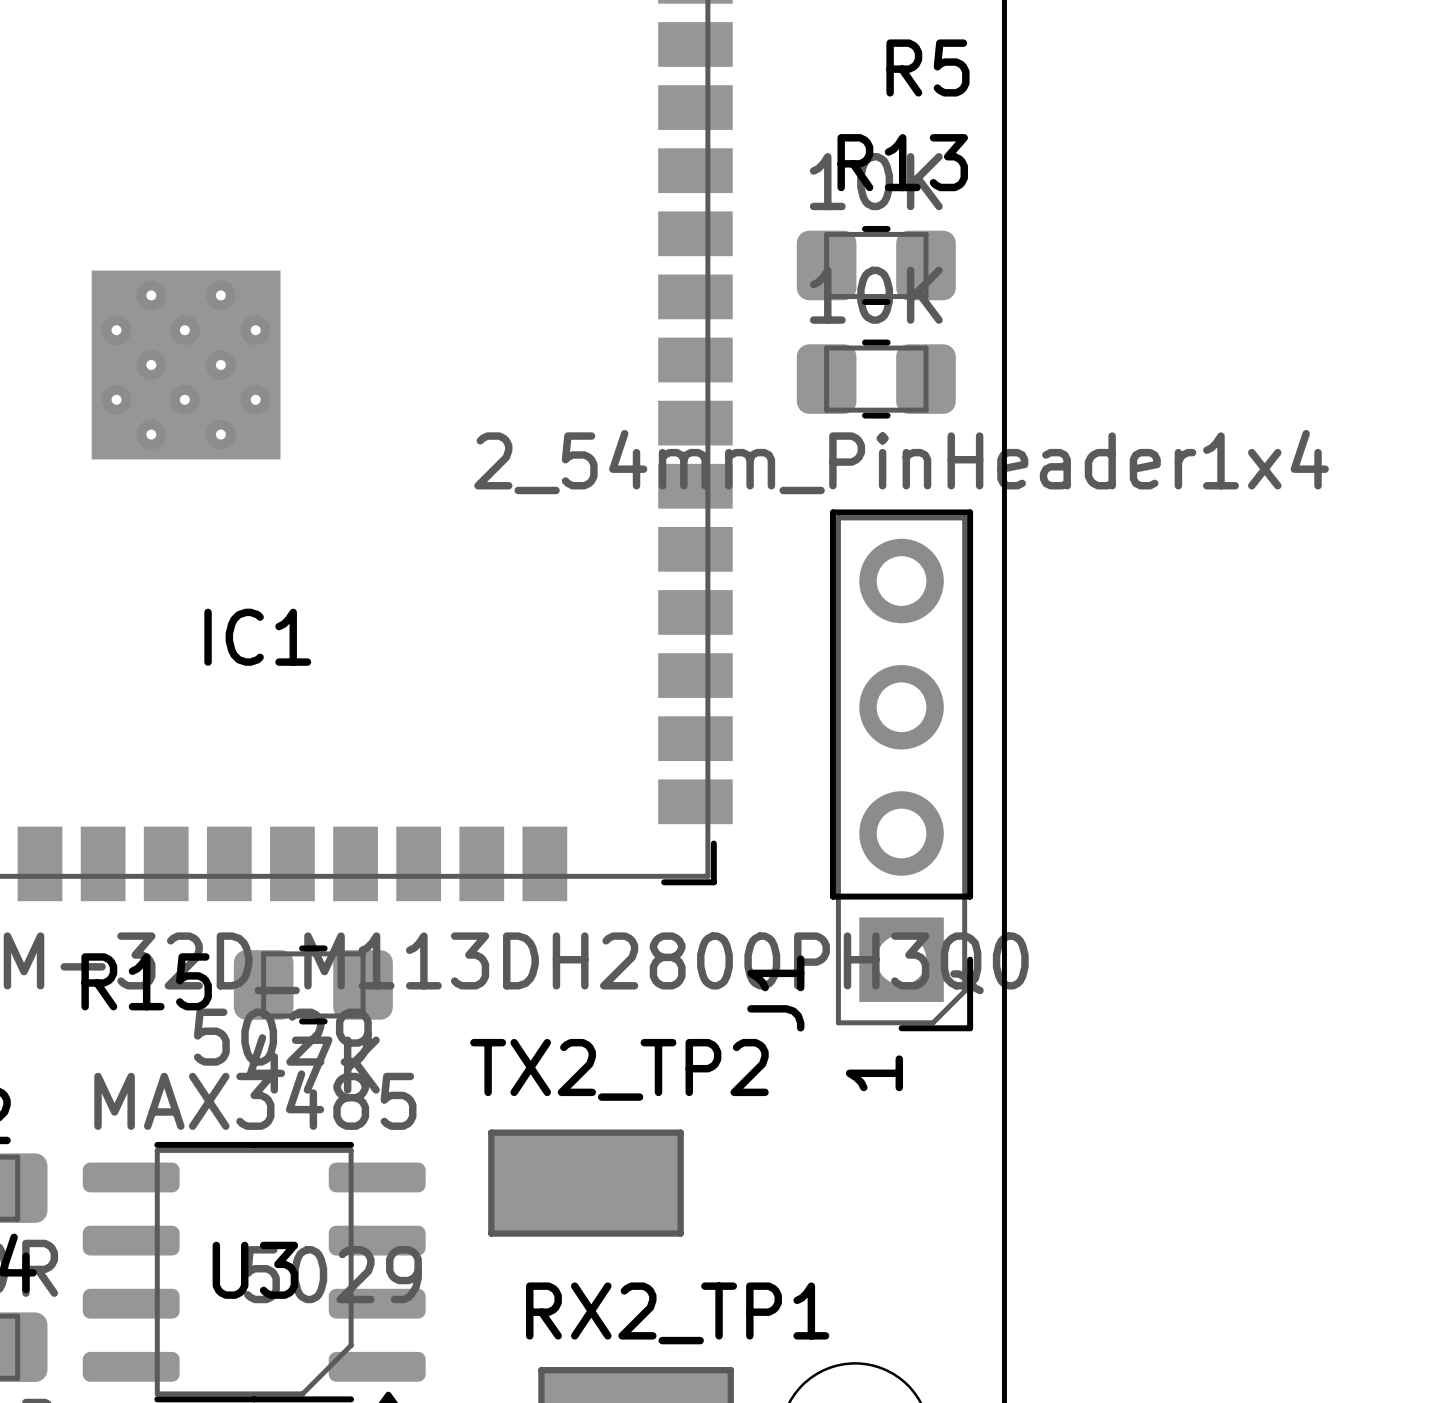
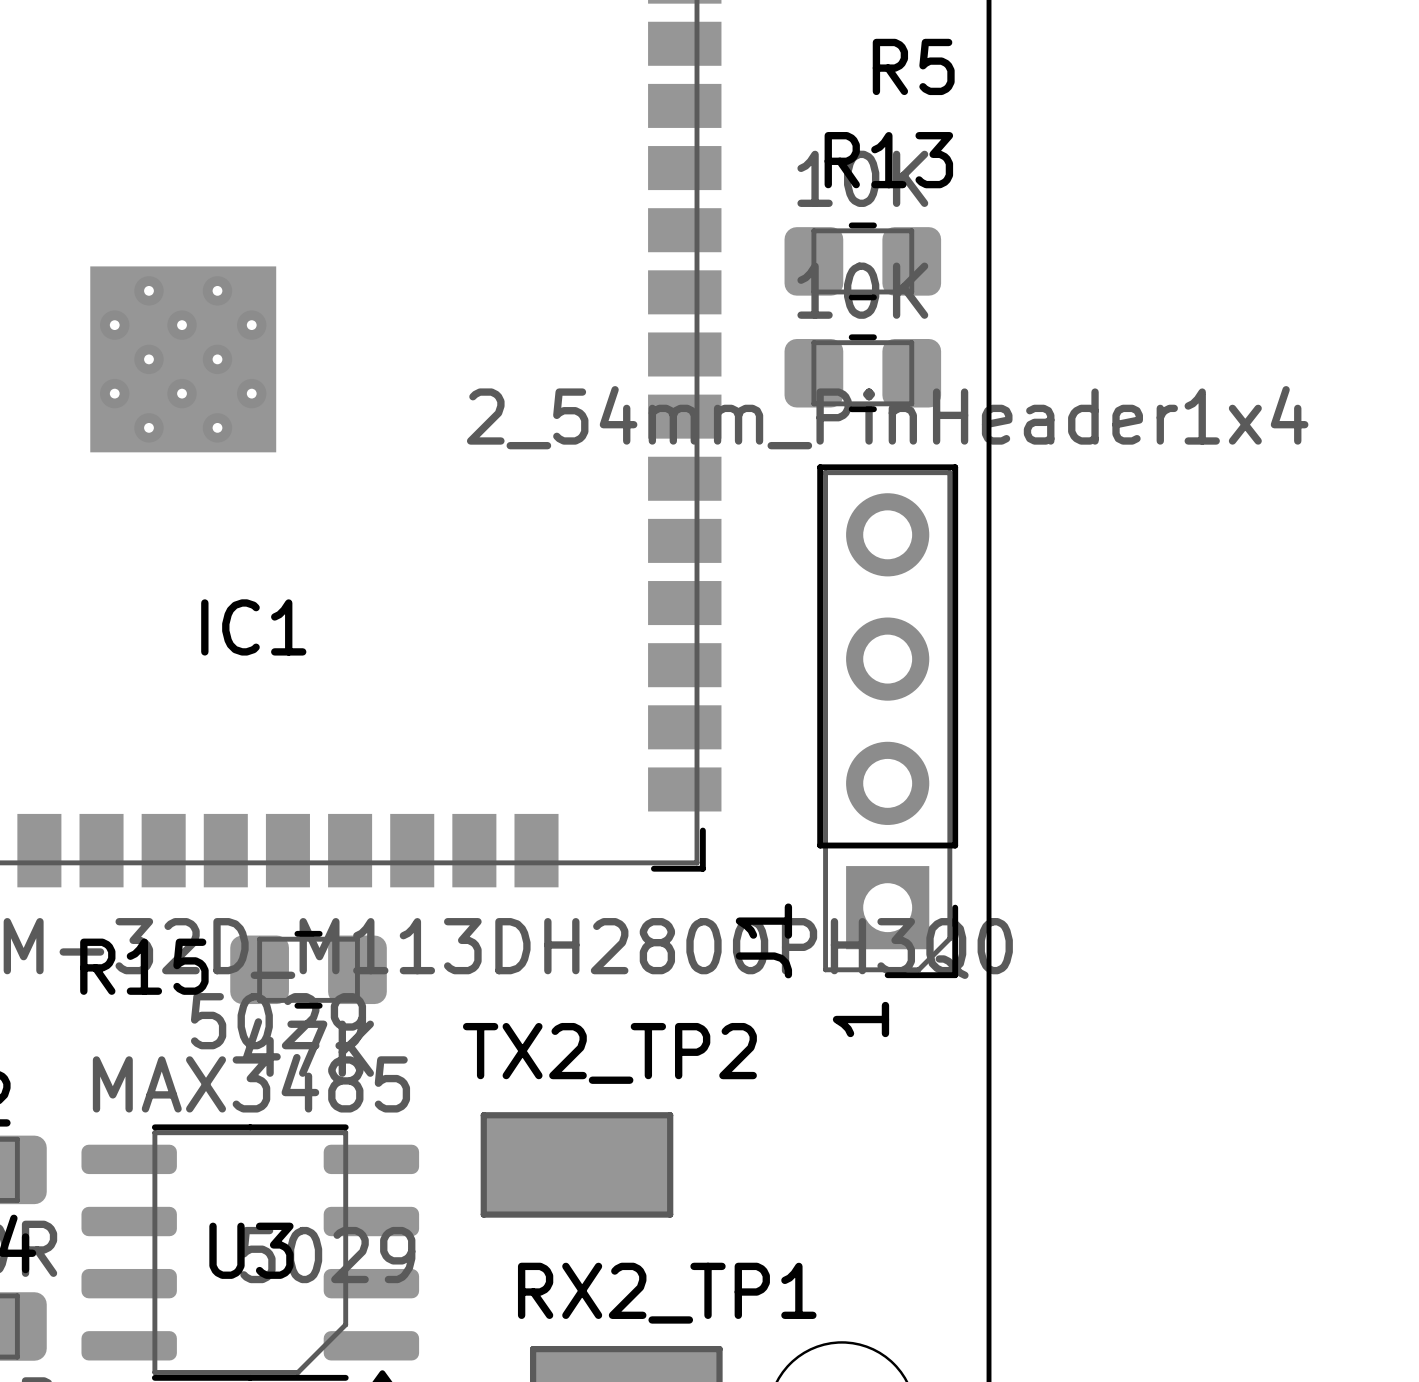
J1 position: (901, 770) -> (887, 721)
text position: 1 (874, 1073) -> 1 (860, 1019)

